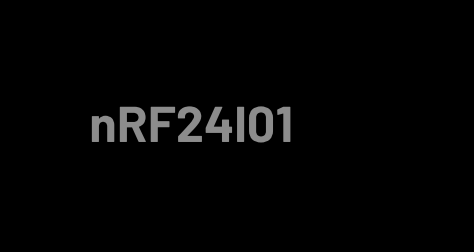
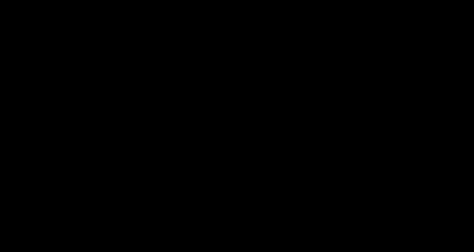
text: nRF24l01 (191, 124) -> none

